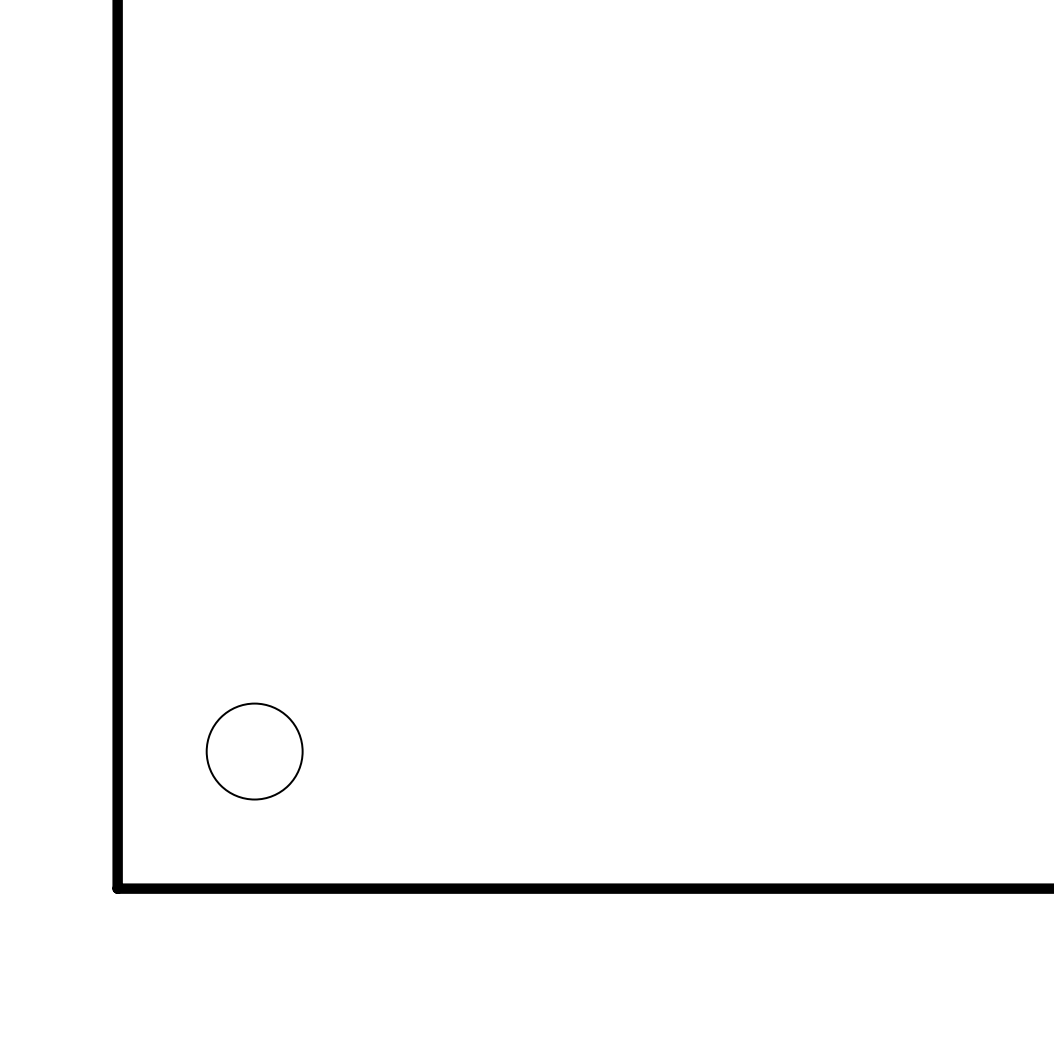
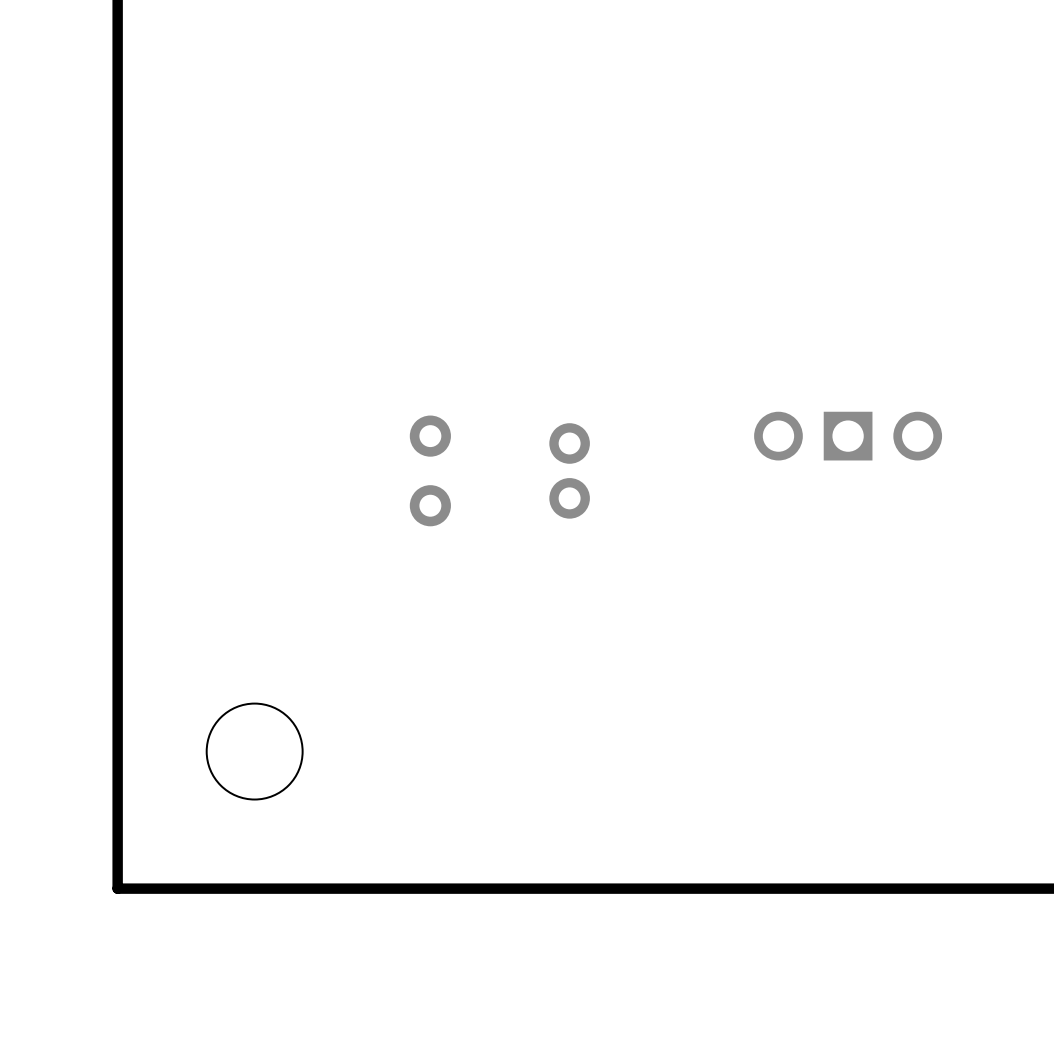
part: none -> (848, 436)
part: none -> (430, 470)
part: none -> (569, 470)

